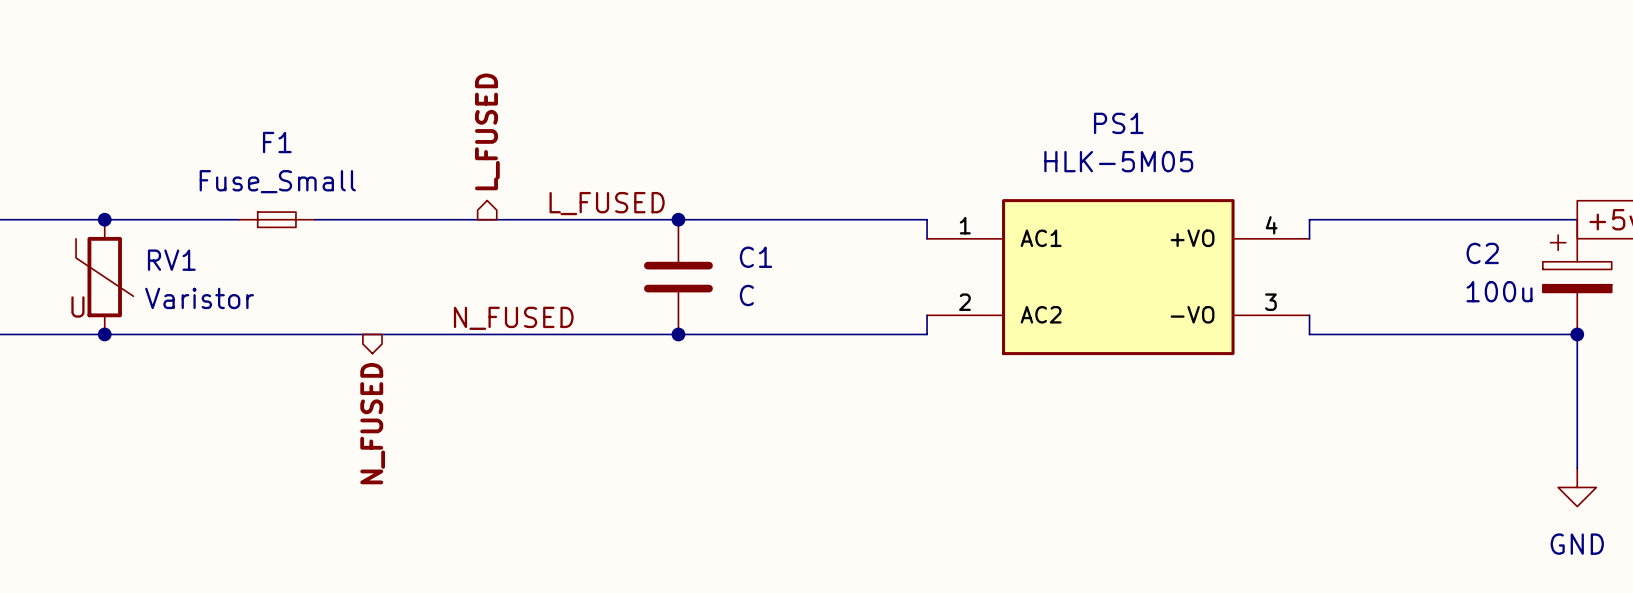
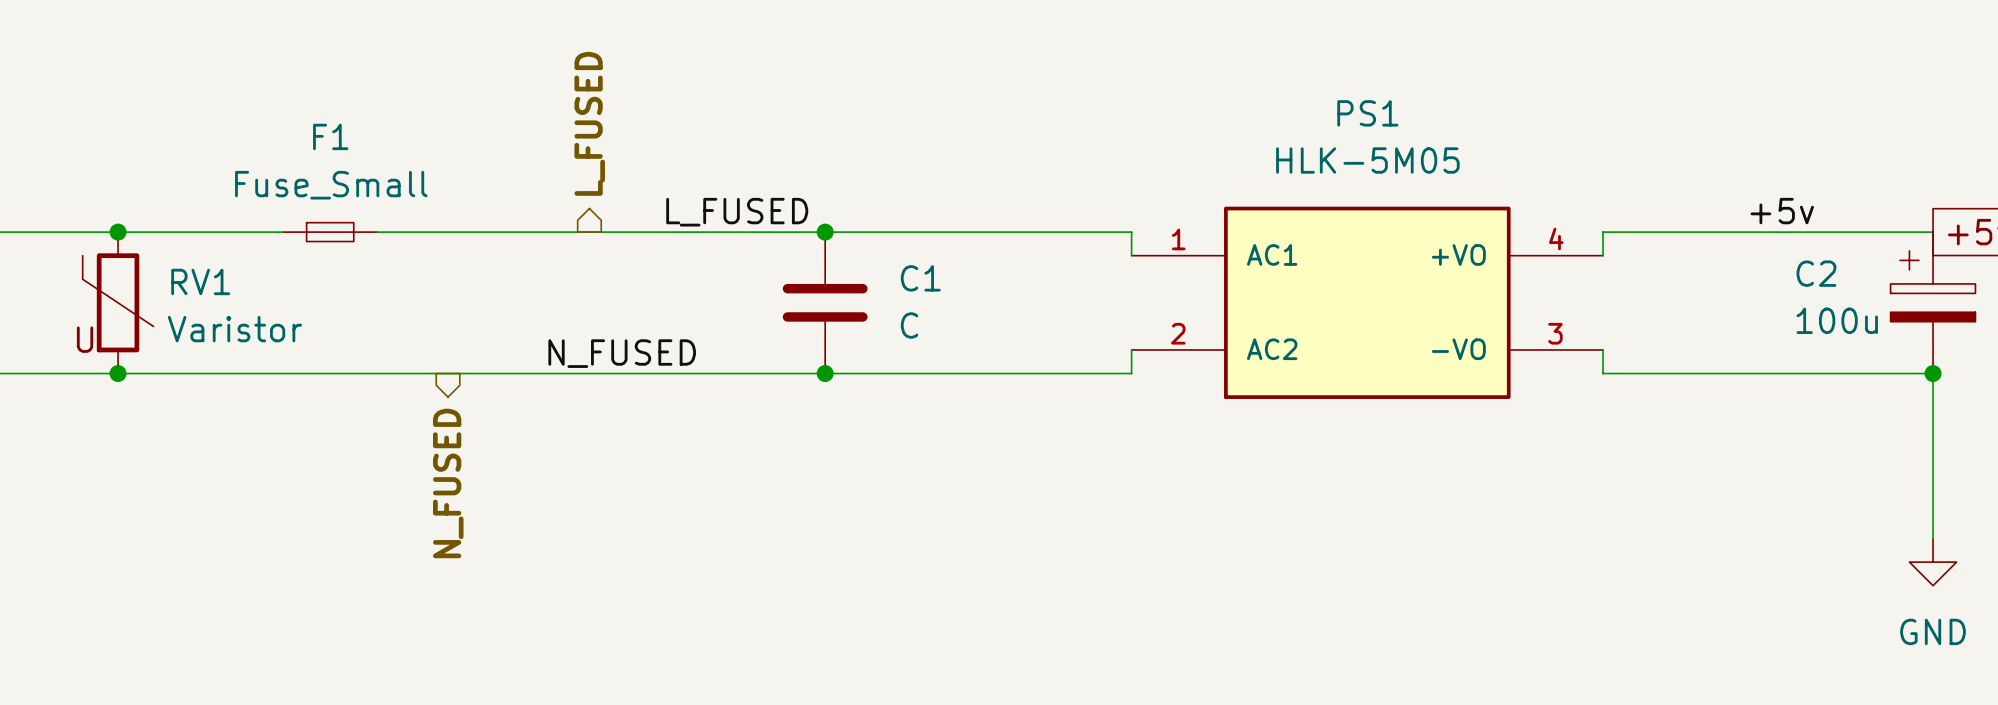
label: none -> +5v (1782, 211)

